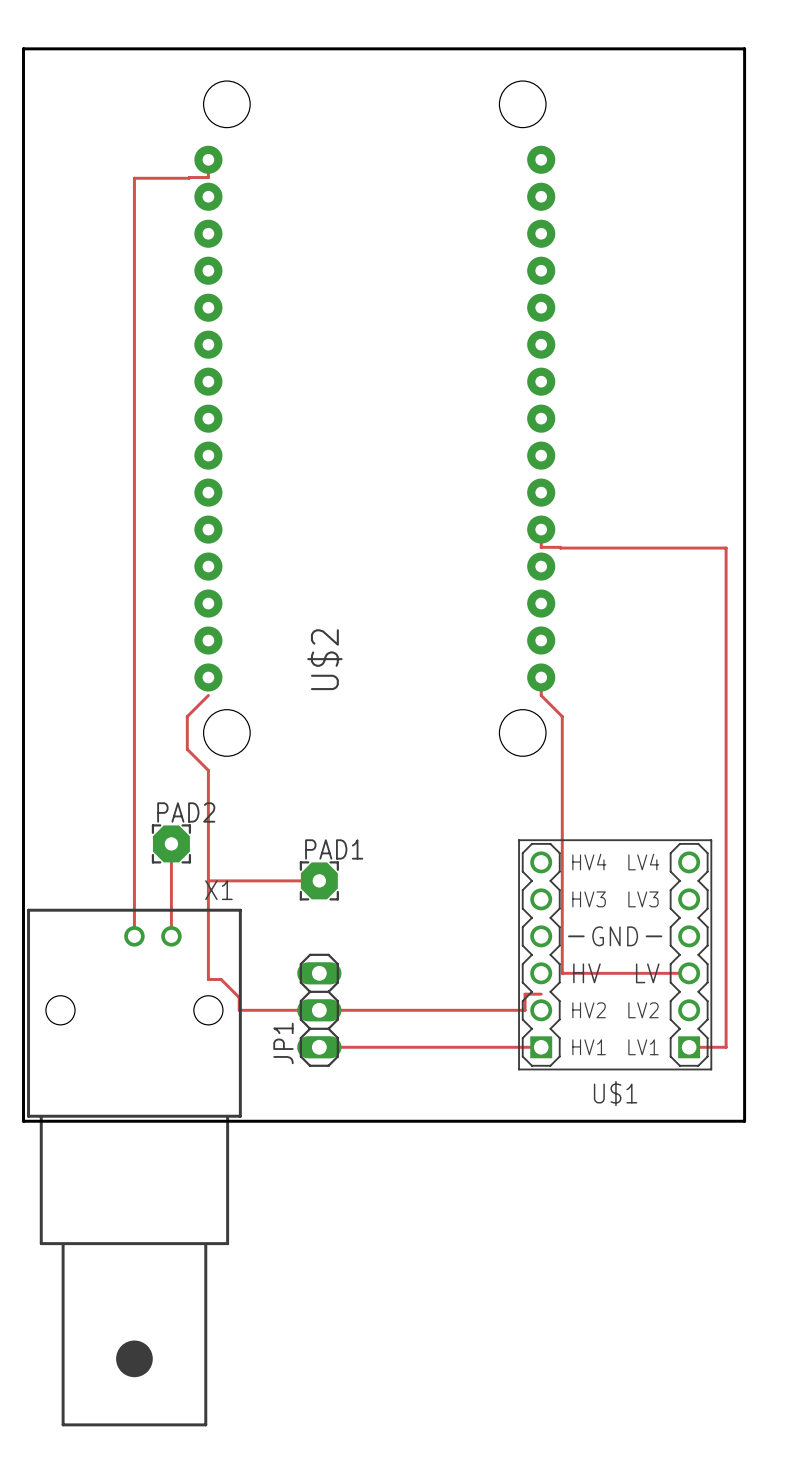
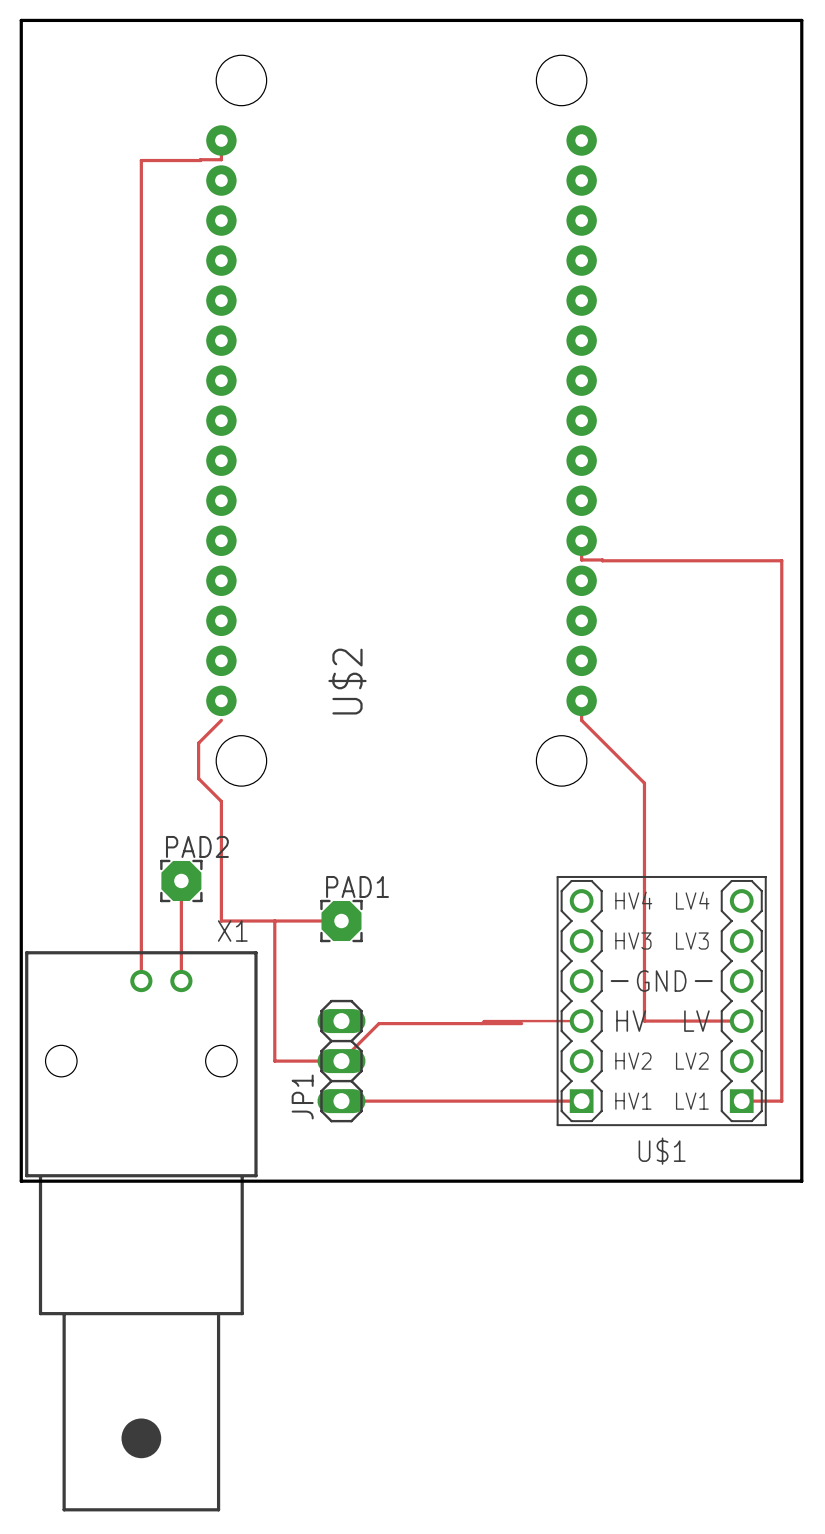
track: (562, 716) (562, 973) (599, 973) -> (604, 743) (644, 783) (644, 1021)
track: (208, 880) (208, 979) (221, 979) (239, 997) (239, 1010) (257, 1010) -> (274, 921) (274, 1061)
track: none -> (581, 1021) (484, 1021) (481, 1023)
track: (541, 994) (525, 994) (525, 1010) (319, 1010) -> (521, 1023) (378, 1023) (341, 1061)

